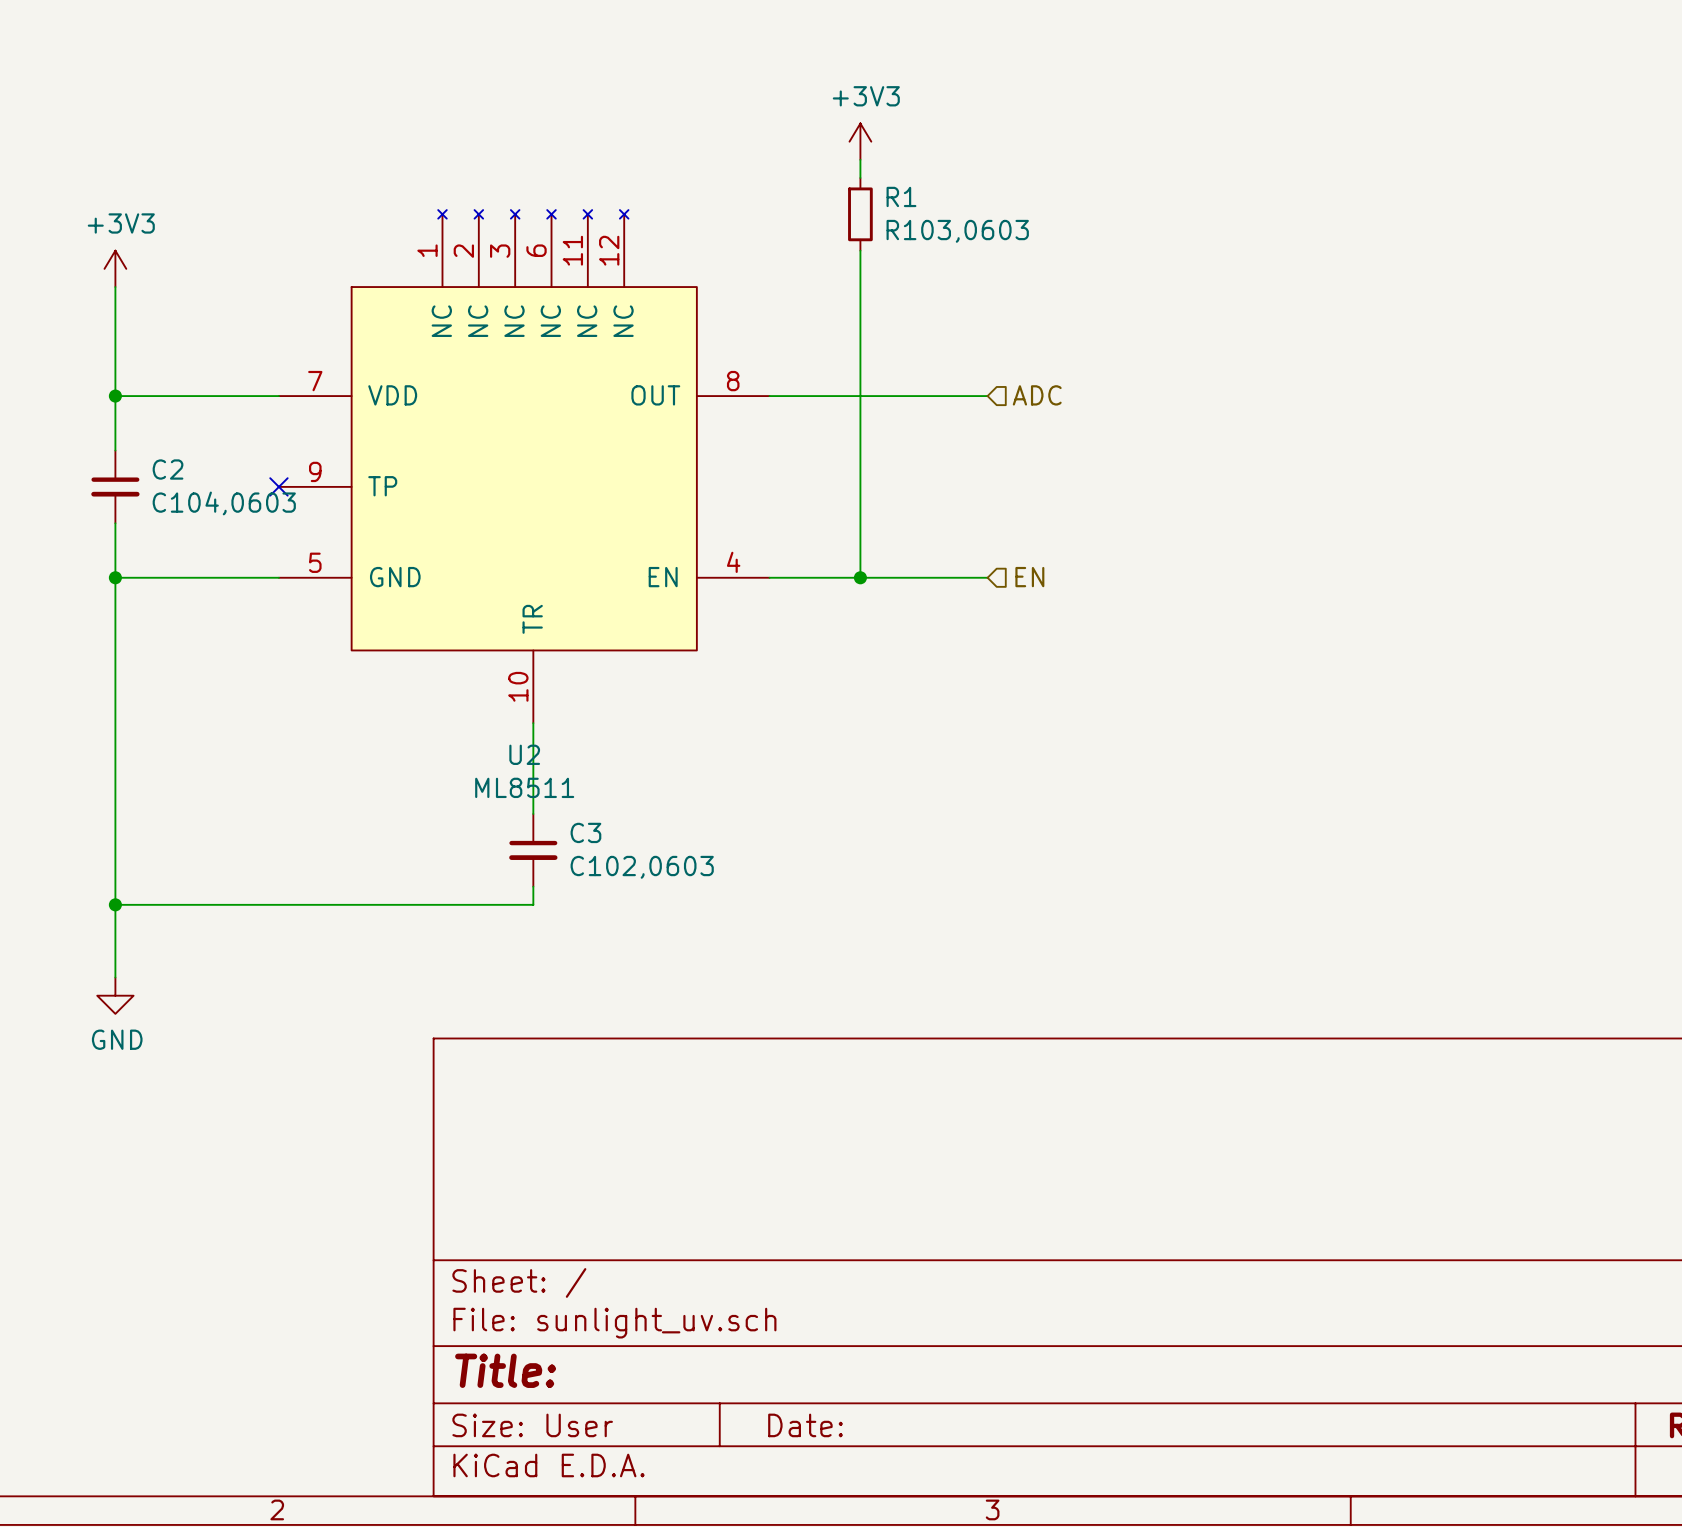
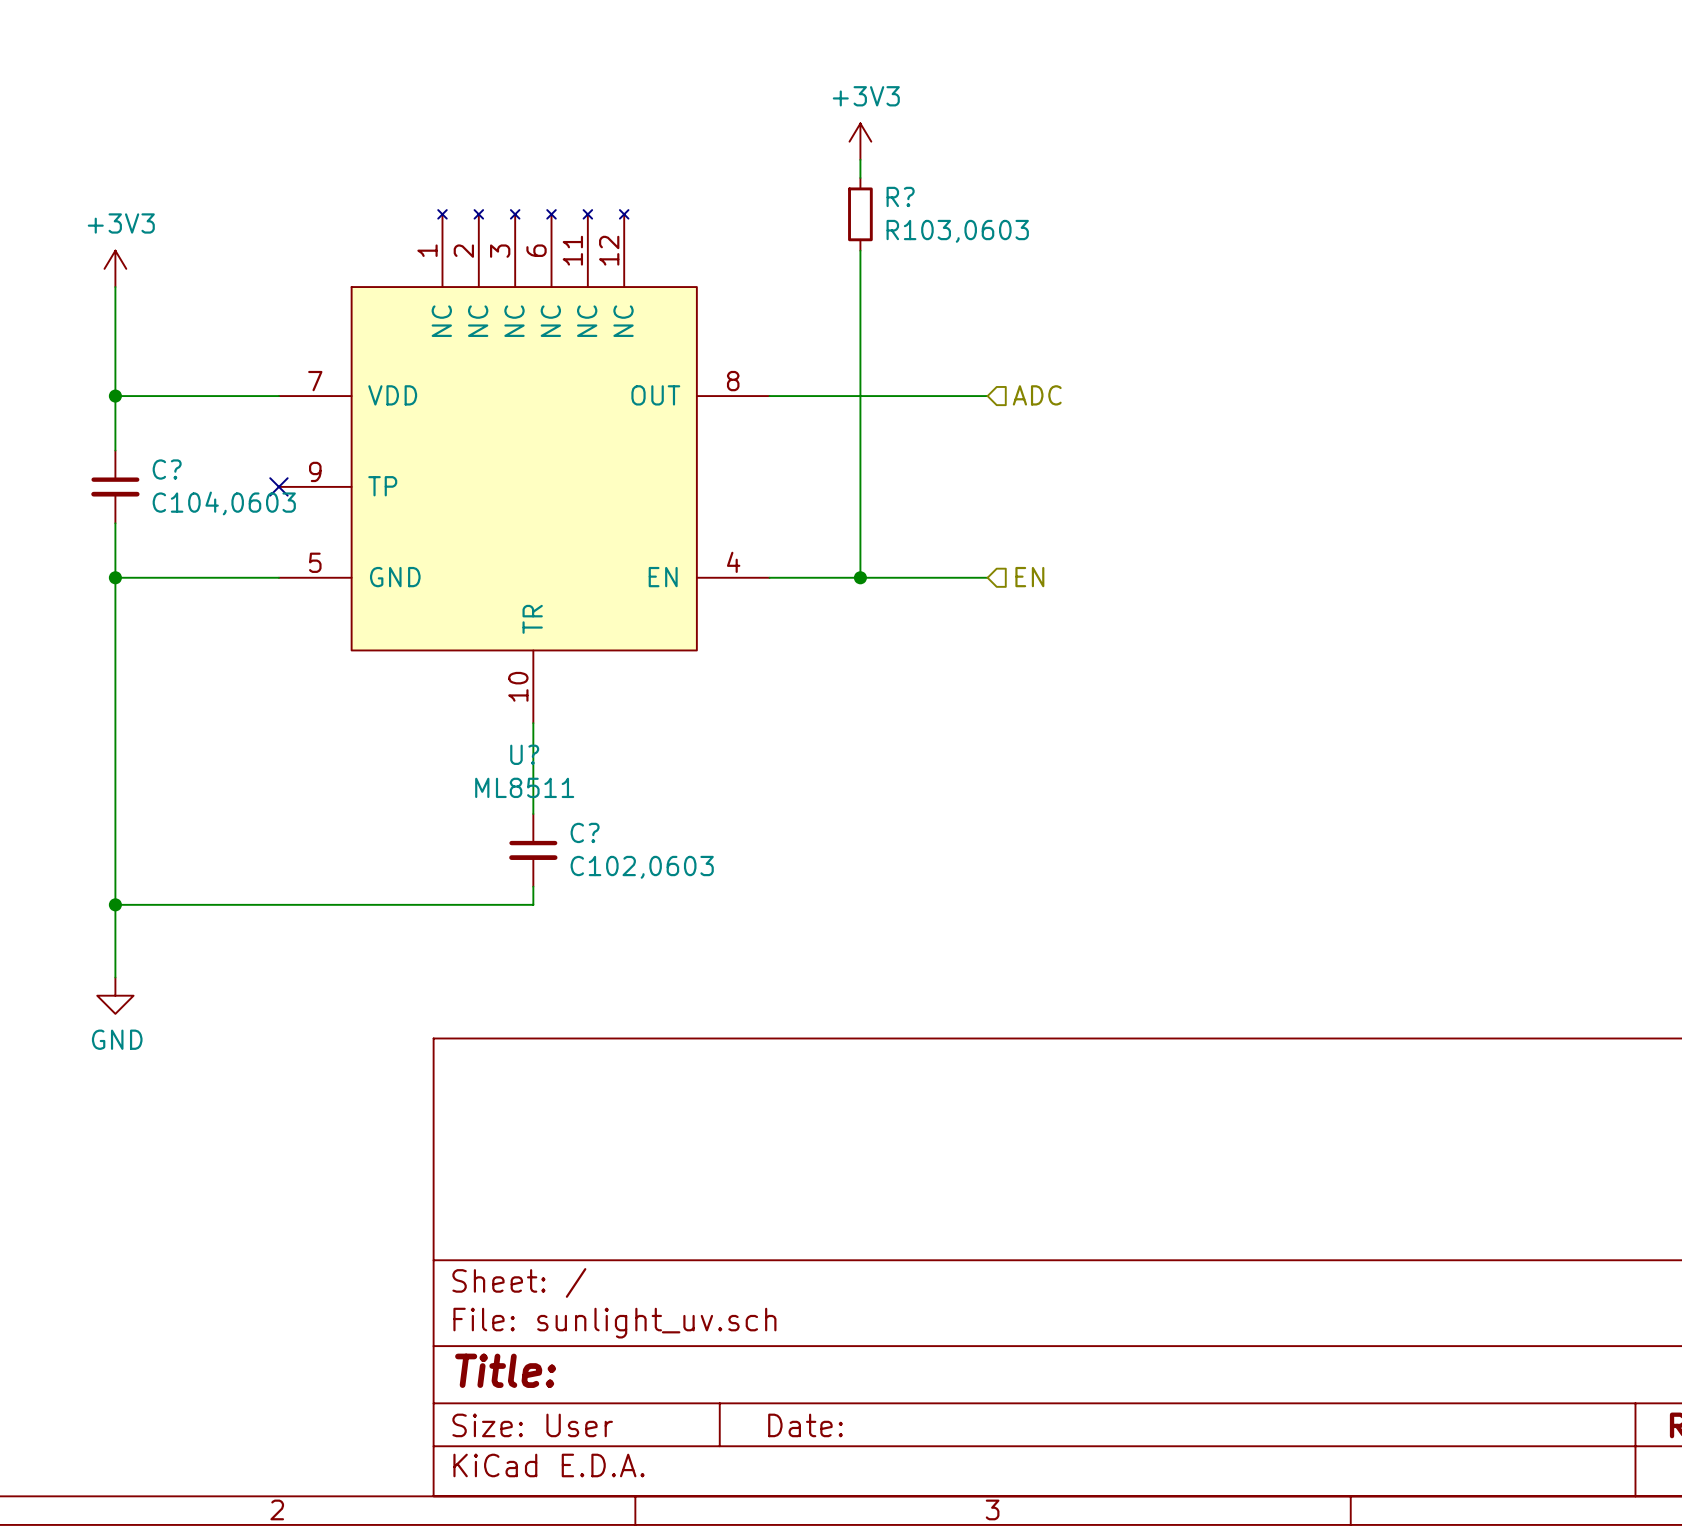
R1 name: R1 (901, 196) -> R? (900, 196)
C2 name: C2 (168, 469) -> C? (167, 469)
U2 name: U2 (524, 754) -> U? (524, 754)
C3 name: C3 (585, 832) -> C? (585, 832)

